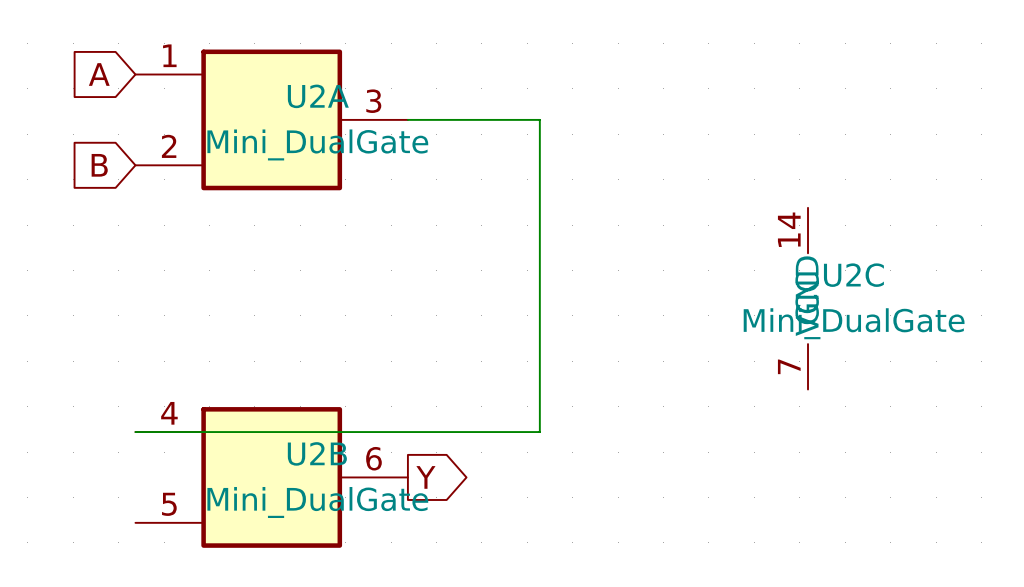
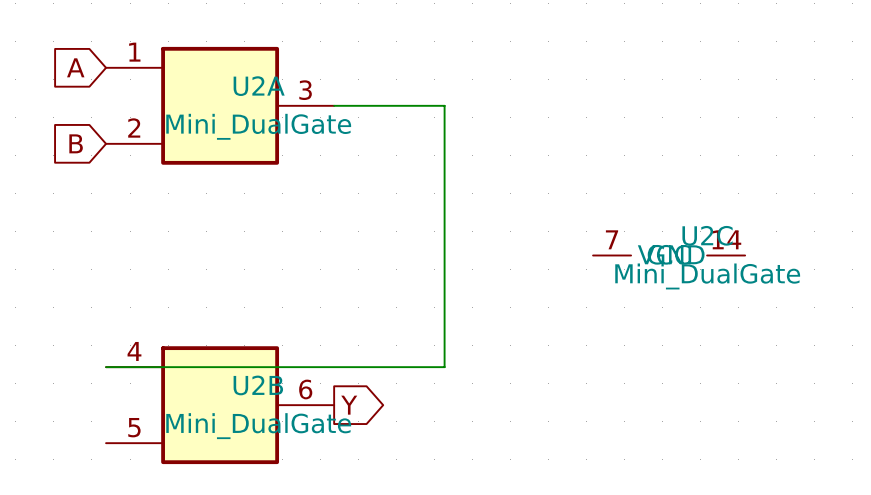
U2C rotation: 0° (808, 298) -> 90° clockwise (669, 255)

